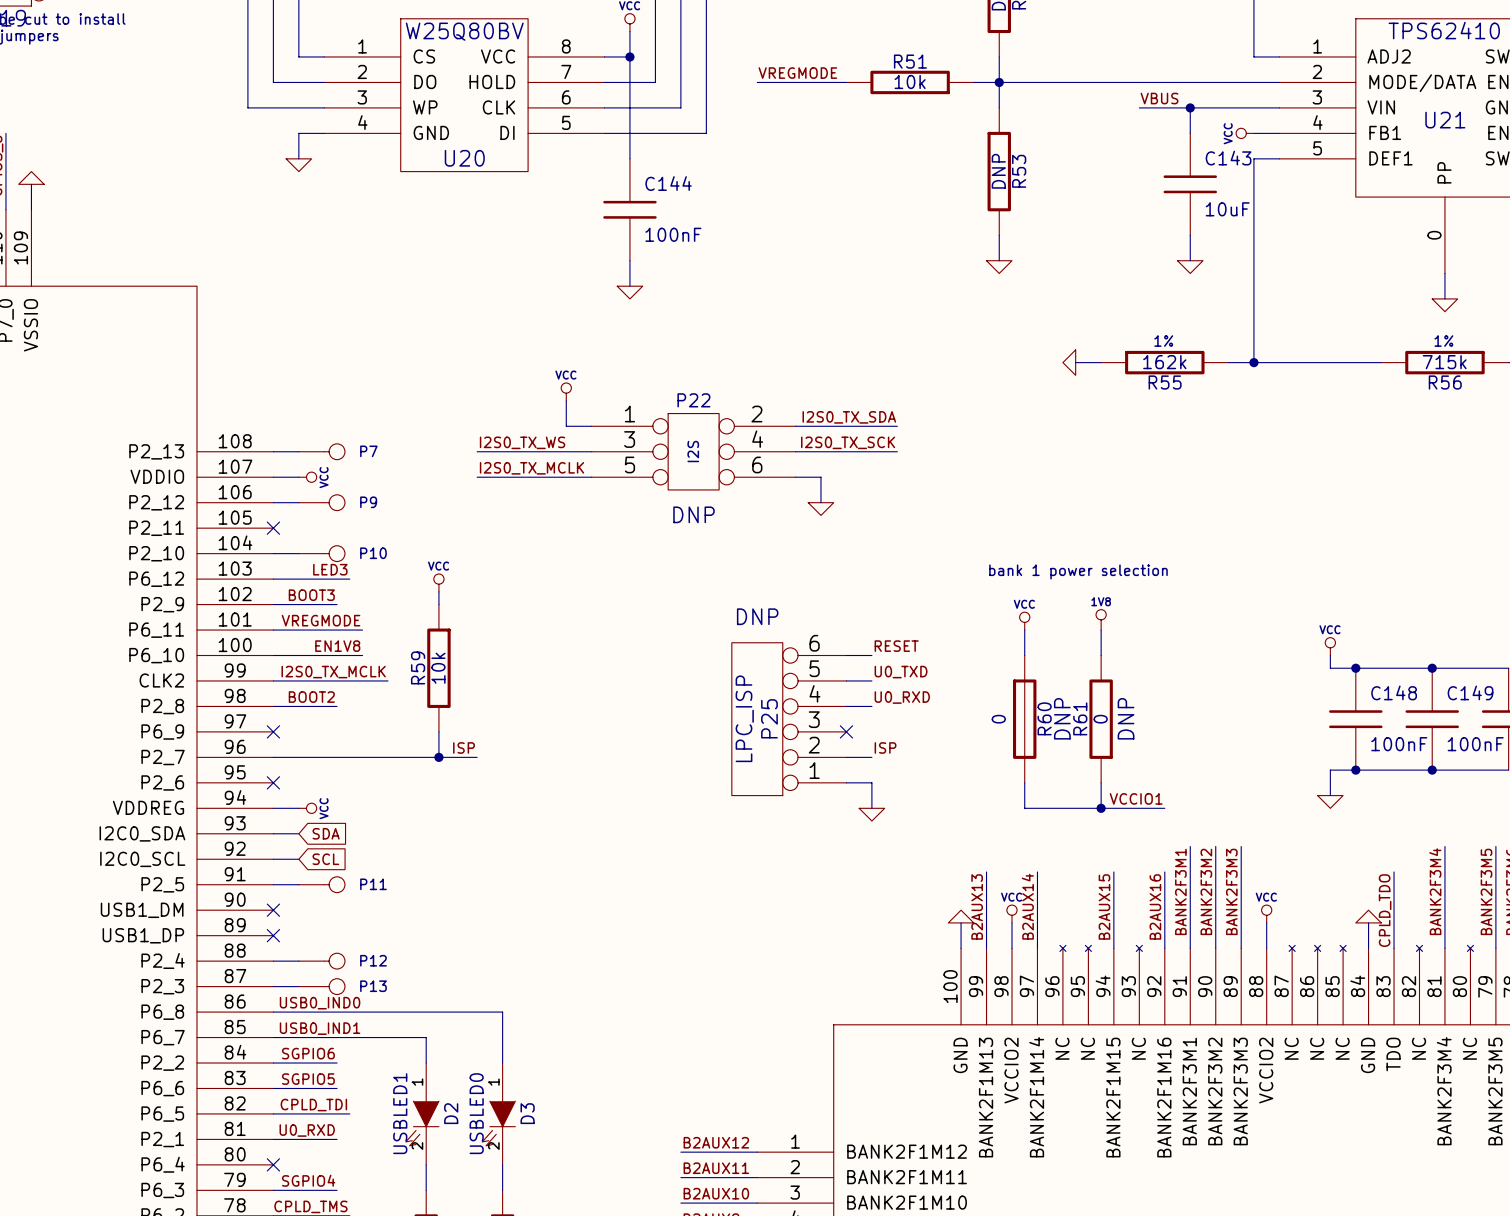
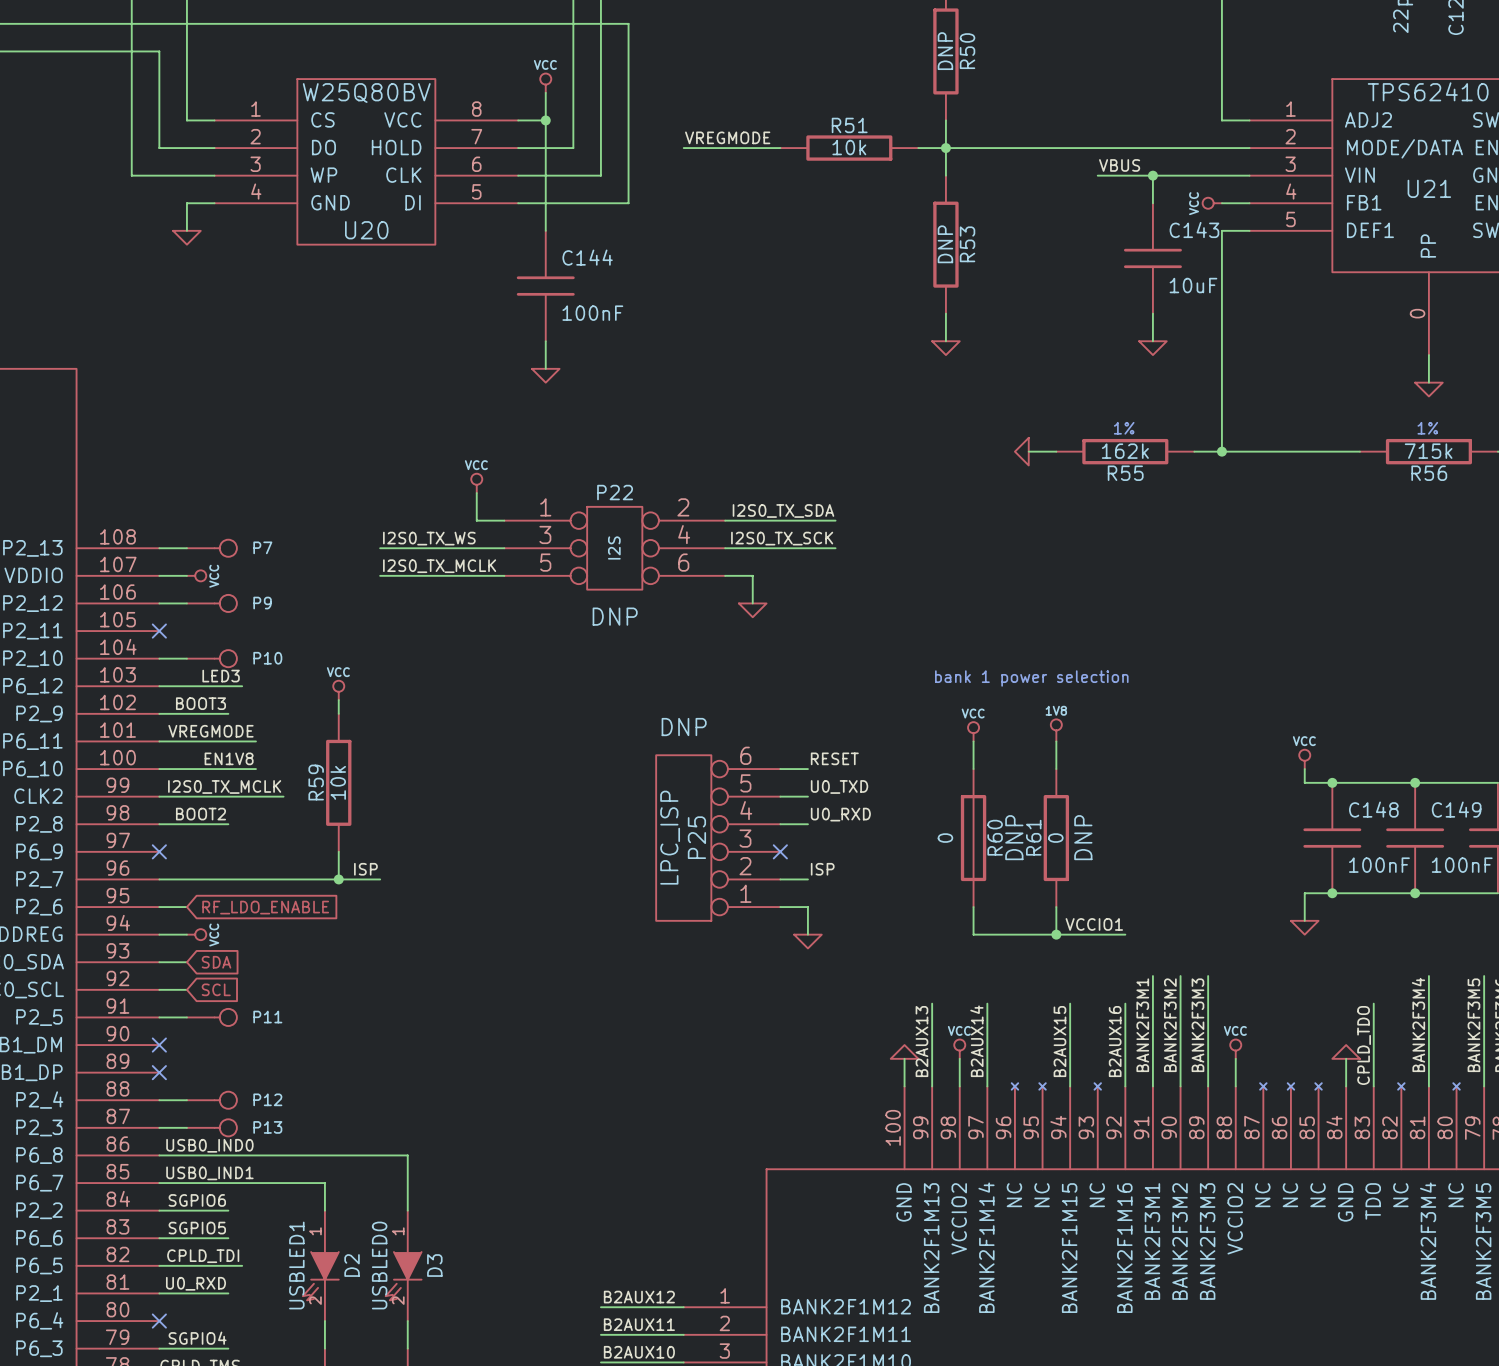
wire: none -> (159, 907) (186, 907)
no-connect mark: (273, 782) -> none
global label: none -> RF_LDO_ENABLE (265, 907)

